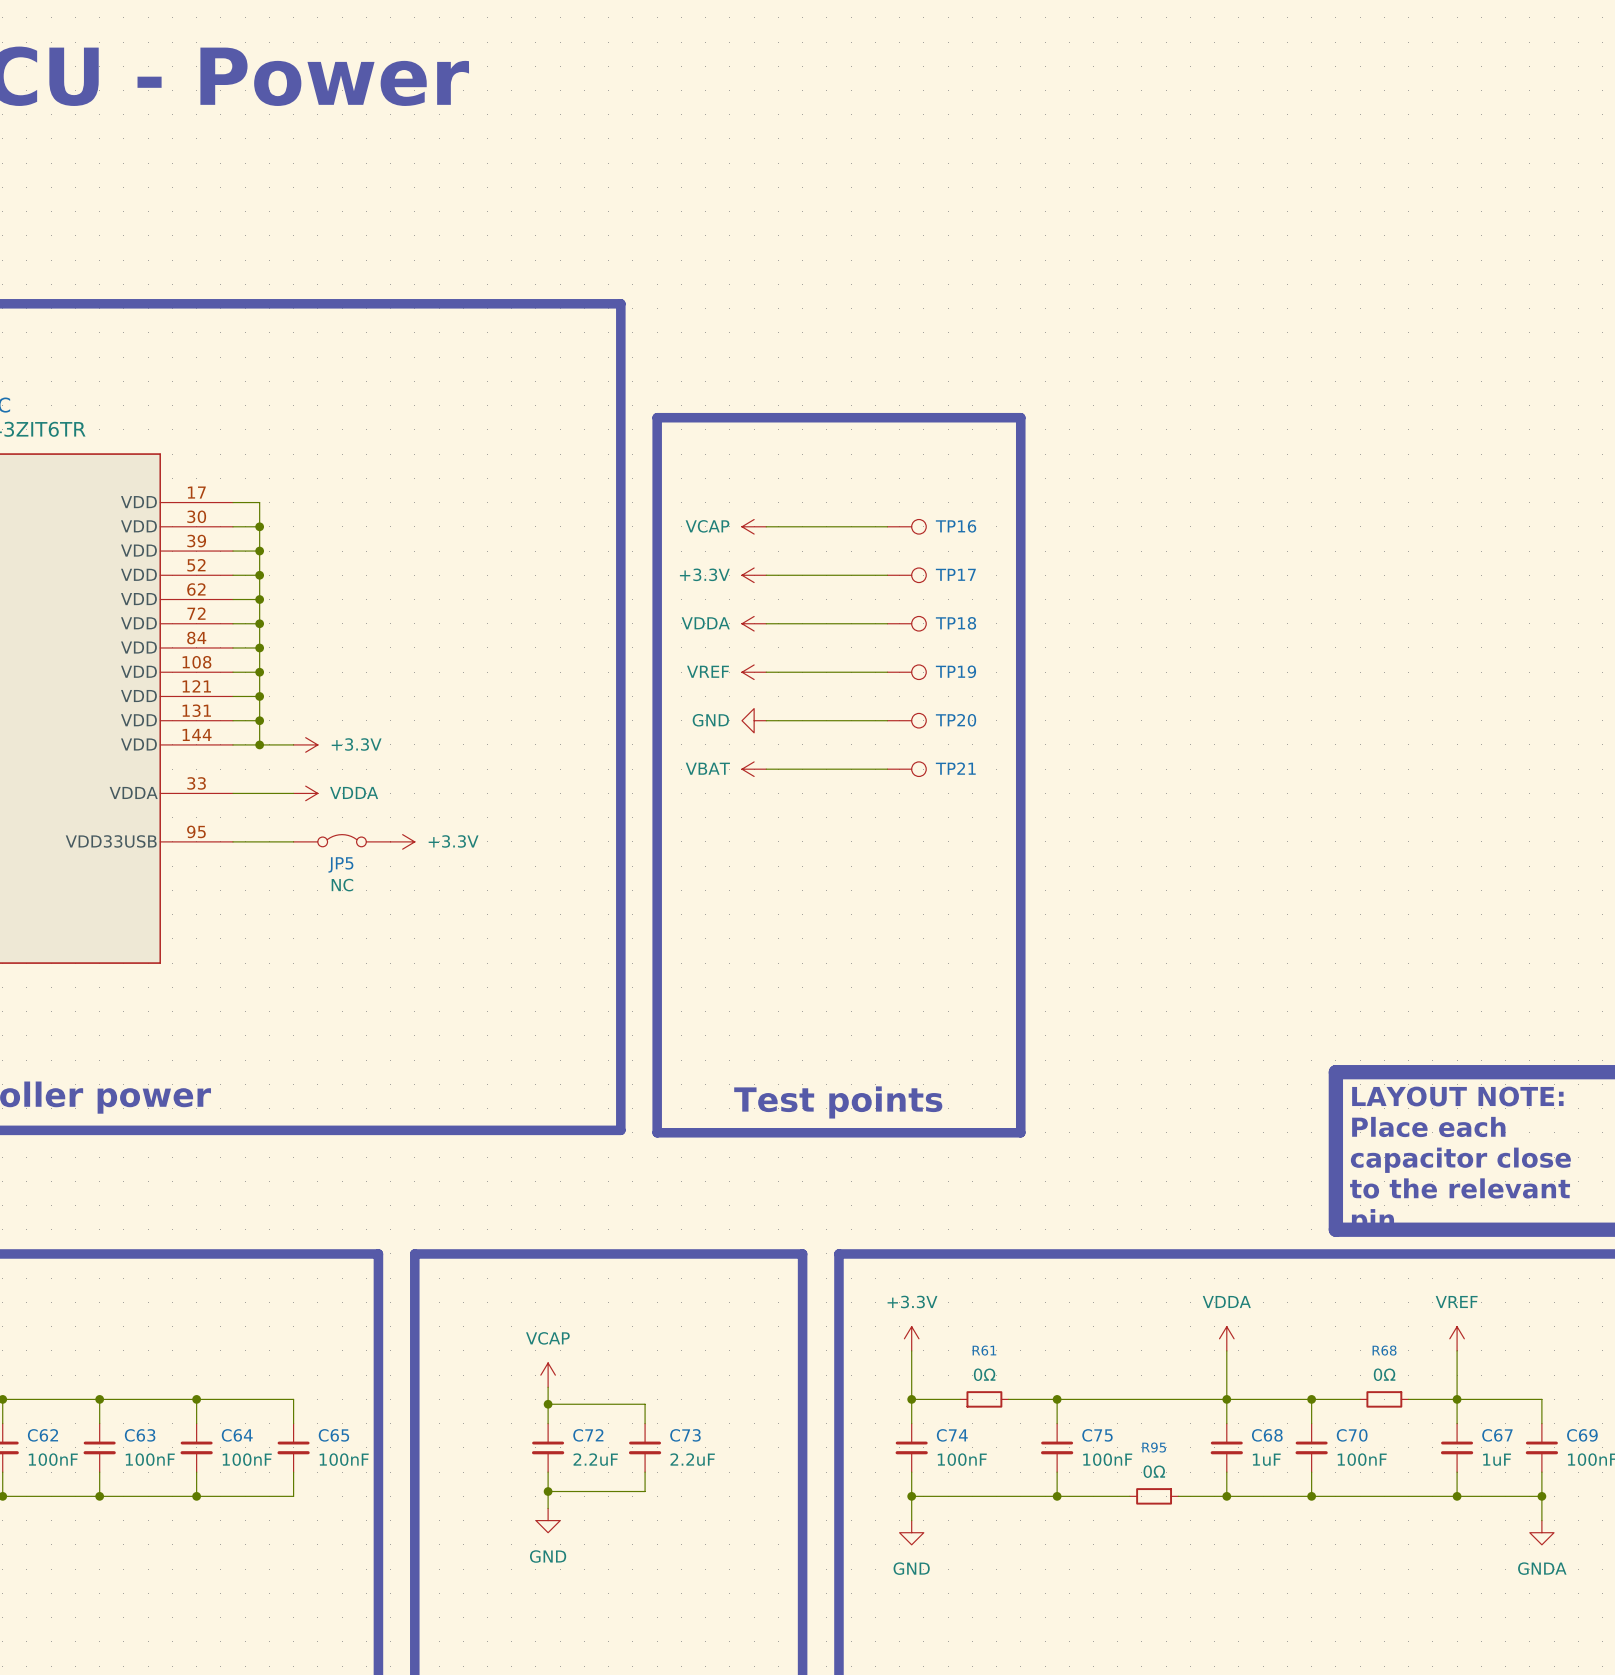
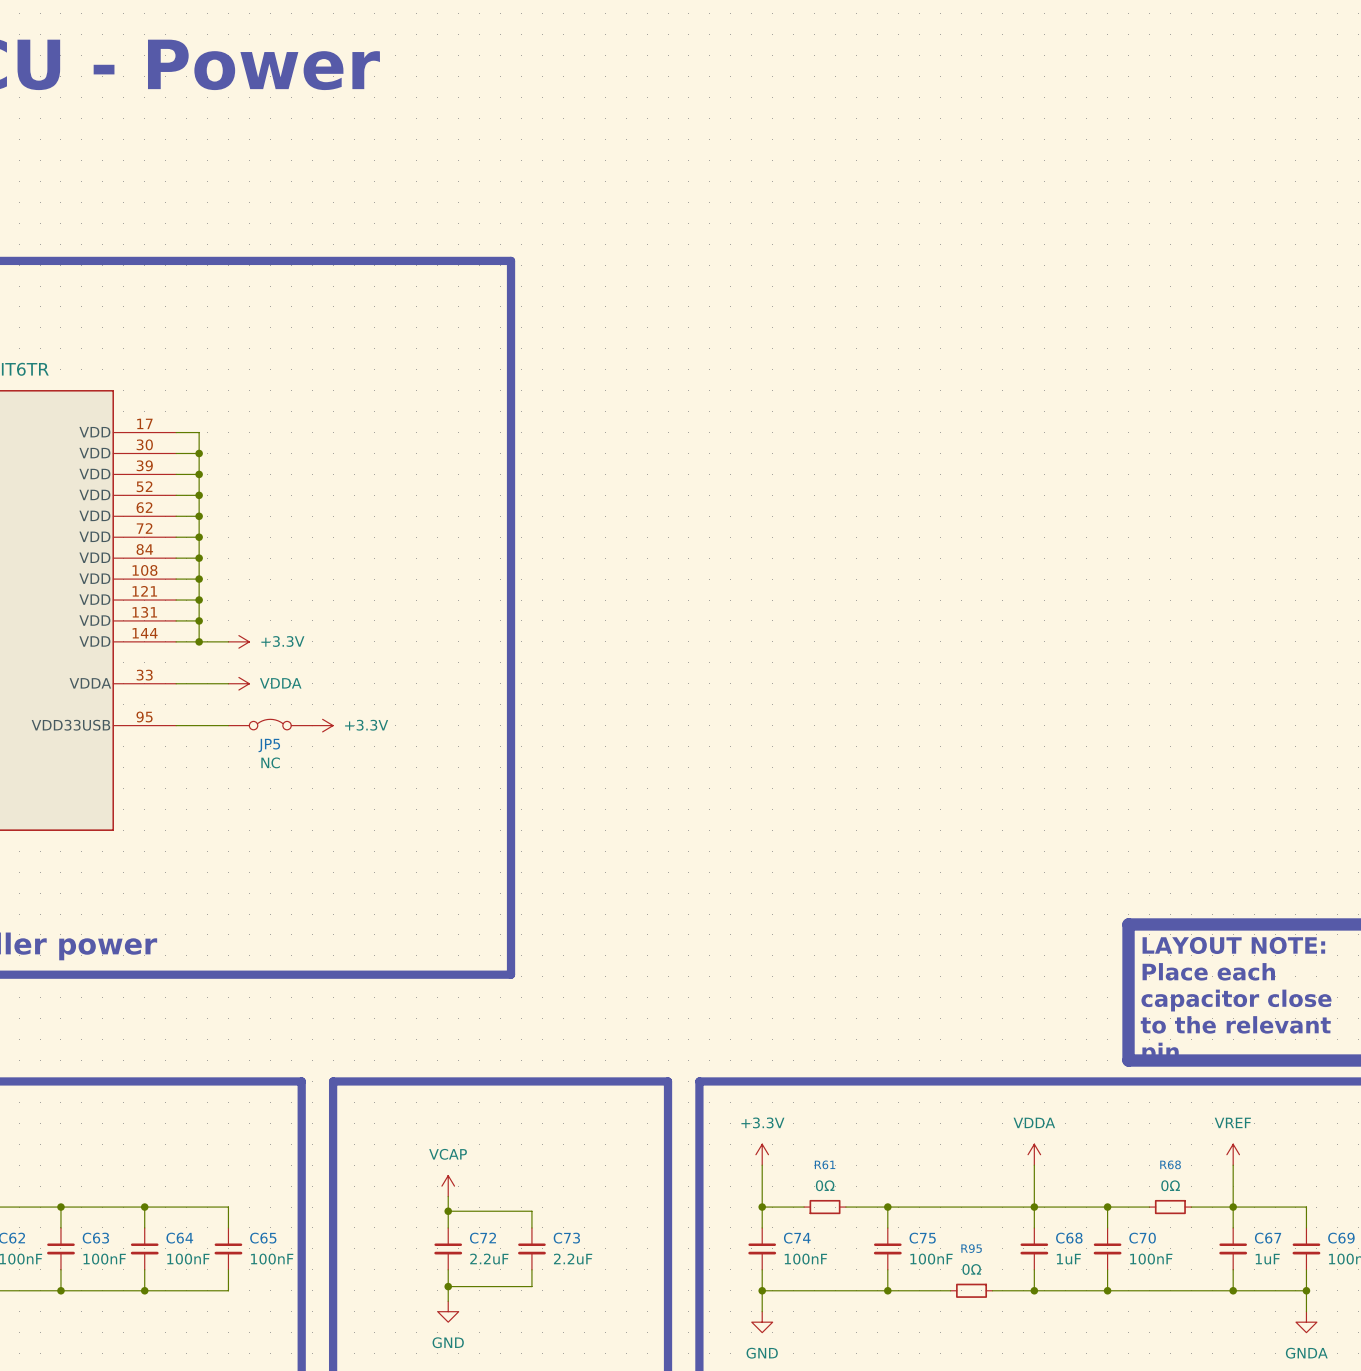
line: (657, 417) (1020, 417) (1020, 1132) (657, 1132) (657, 417) -> none
power symbol: VCAP (754, 526) -> none
wire: (766, 526) (887, 526) -> none
TP16: (906, 526) -> none
power symbol: +3.3V (754, 575) -> none
wire: (766, 575) (887, 575) -> none
TP17: (906, 575) -> none
power symbol: VDDA (754, 623) -> none
wire: (766, 623) (887, 623) -> none
TP18: (906, 623) -> none
power symbol: VREF (754, 672) -> none
wire: (766, 672) (887, 672) -> none
TP19: (906, 672) -> none
power symbol: GND (754, 720) -> none
wire: (766, 720) (887, 720) -> none
TP20: (906, 720) -> none
power symbol: VBAT (754, 769) -> none
wire: (766, 769) (887, 769) -> none
TP21: (906, 769) -> none
text: Test points (838, 1102) -> none

